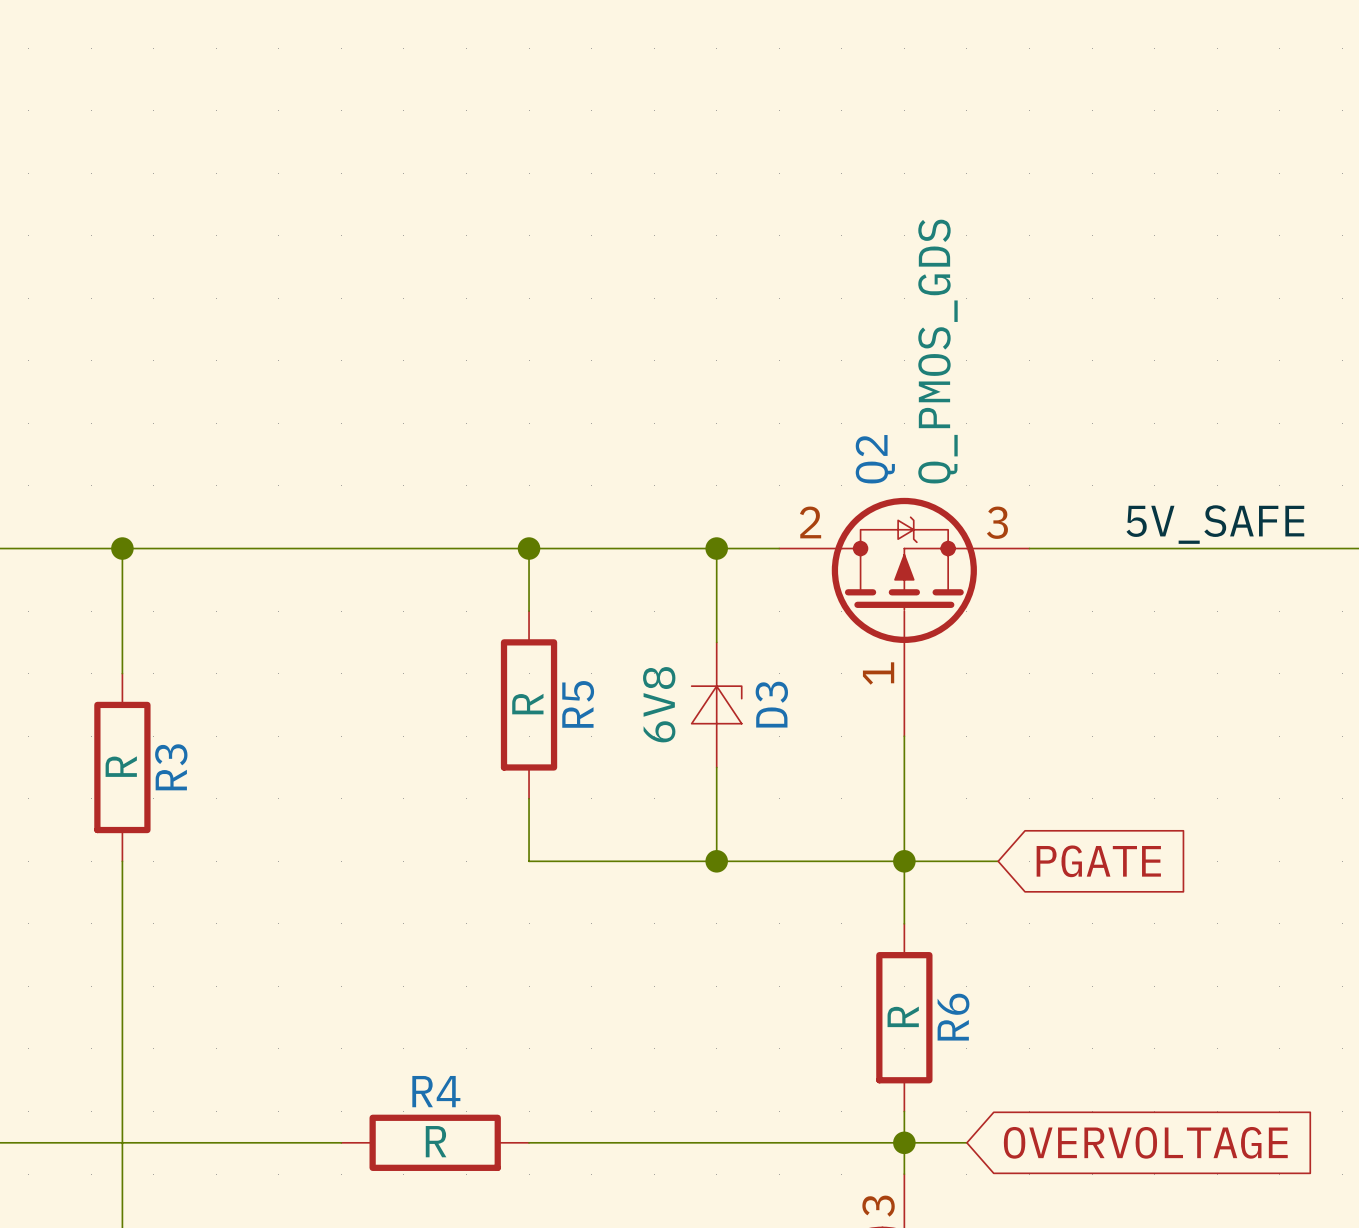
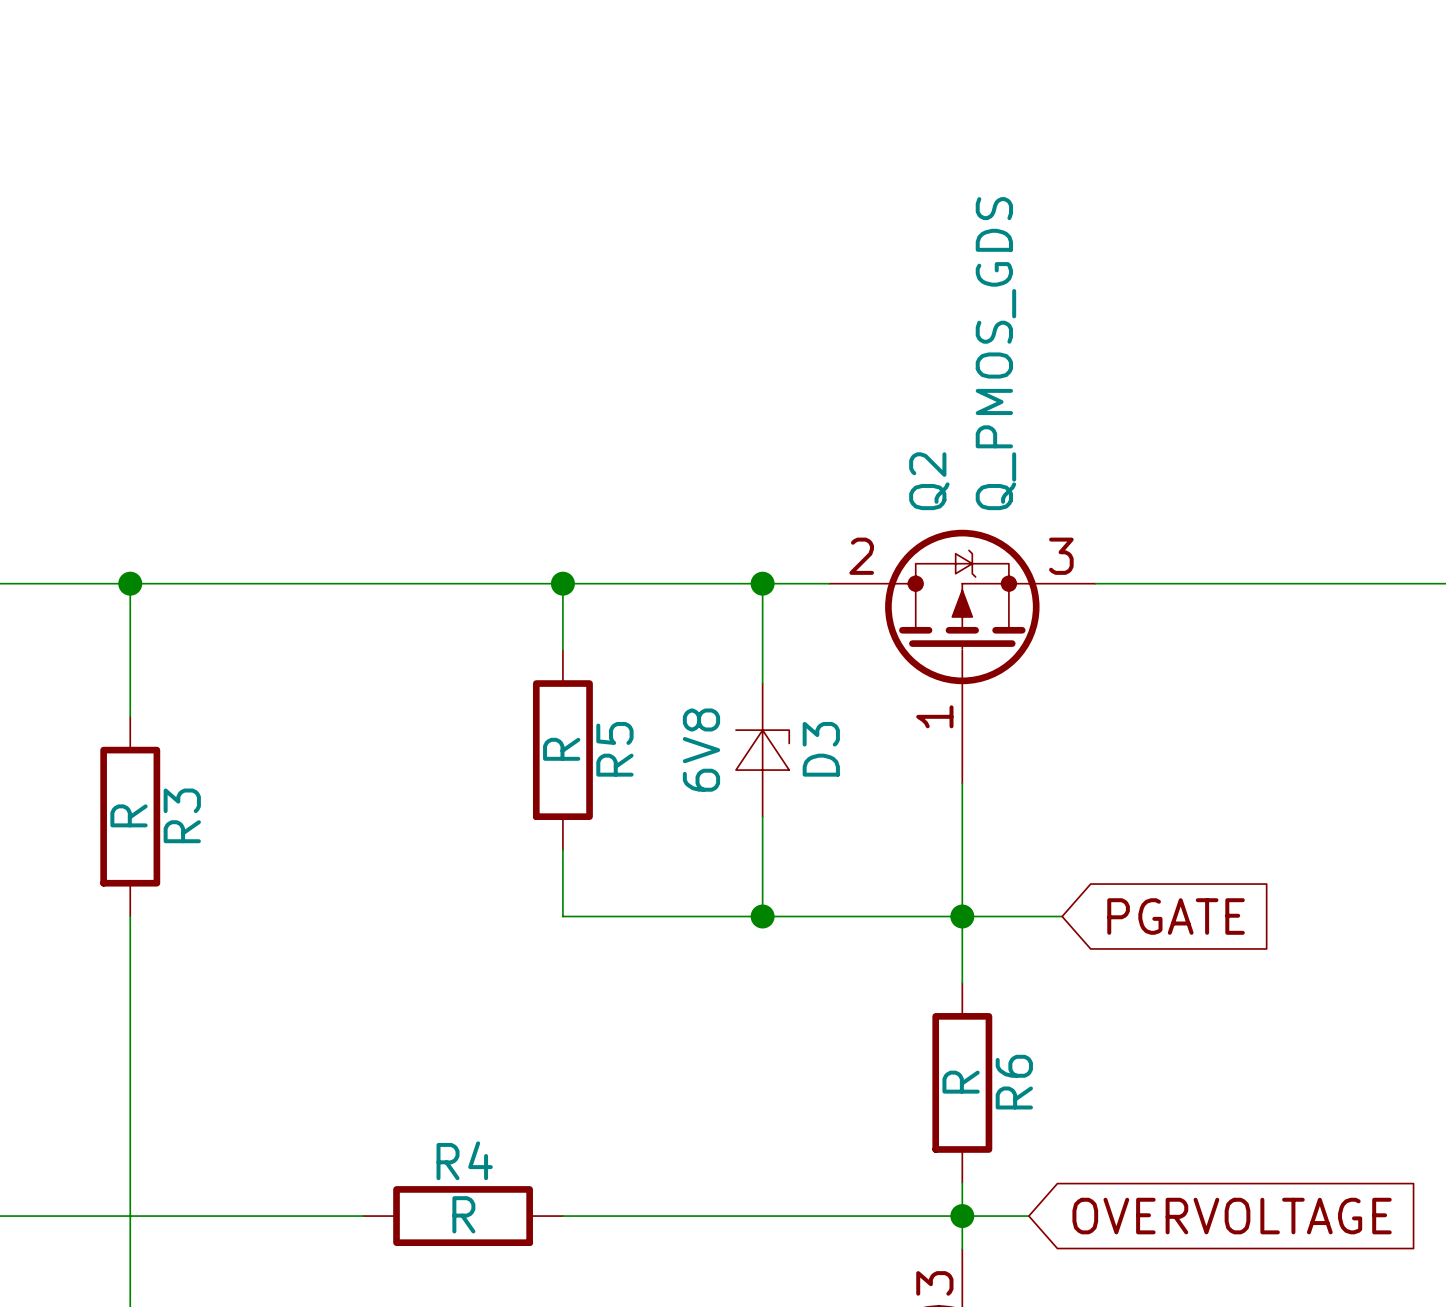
label: 5V_SAFE (1215, 524) -> none

